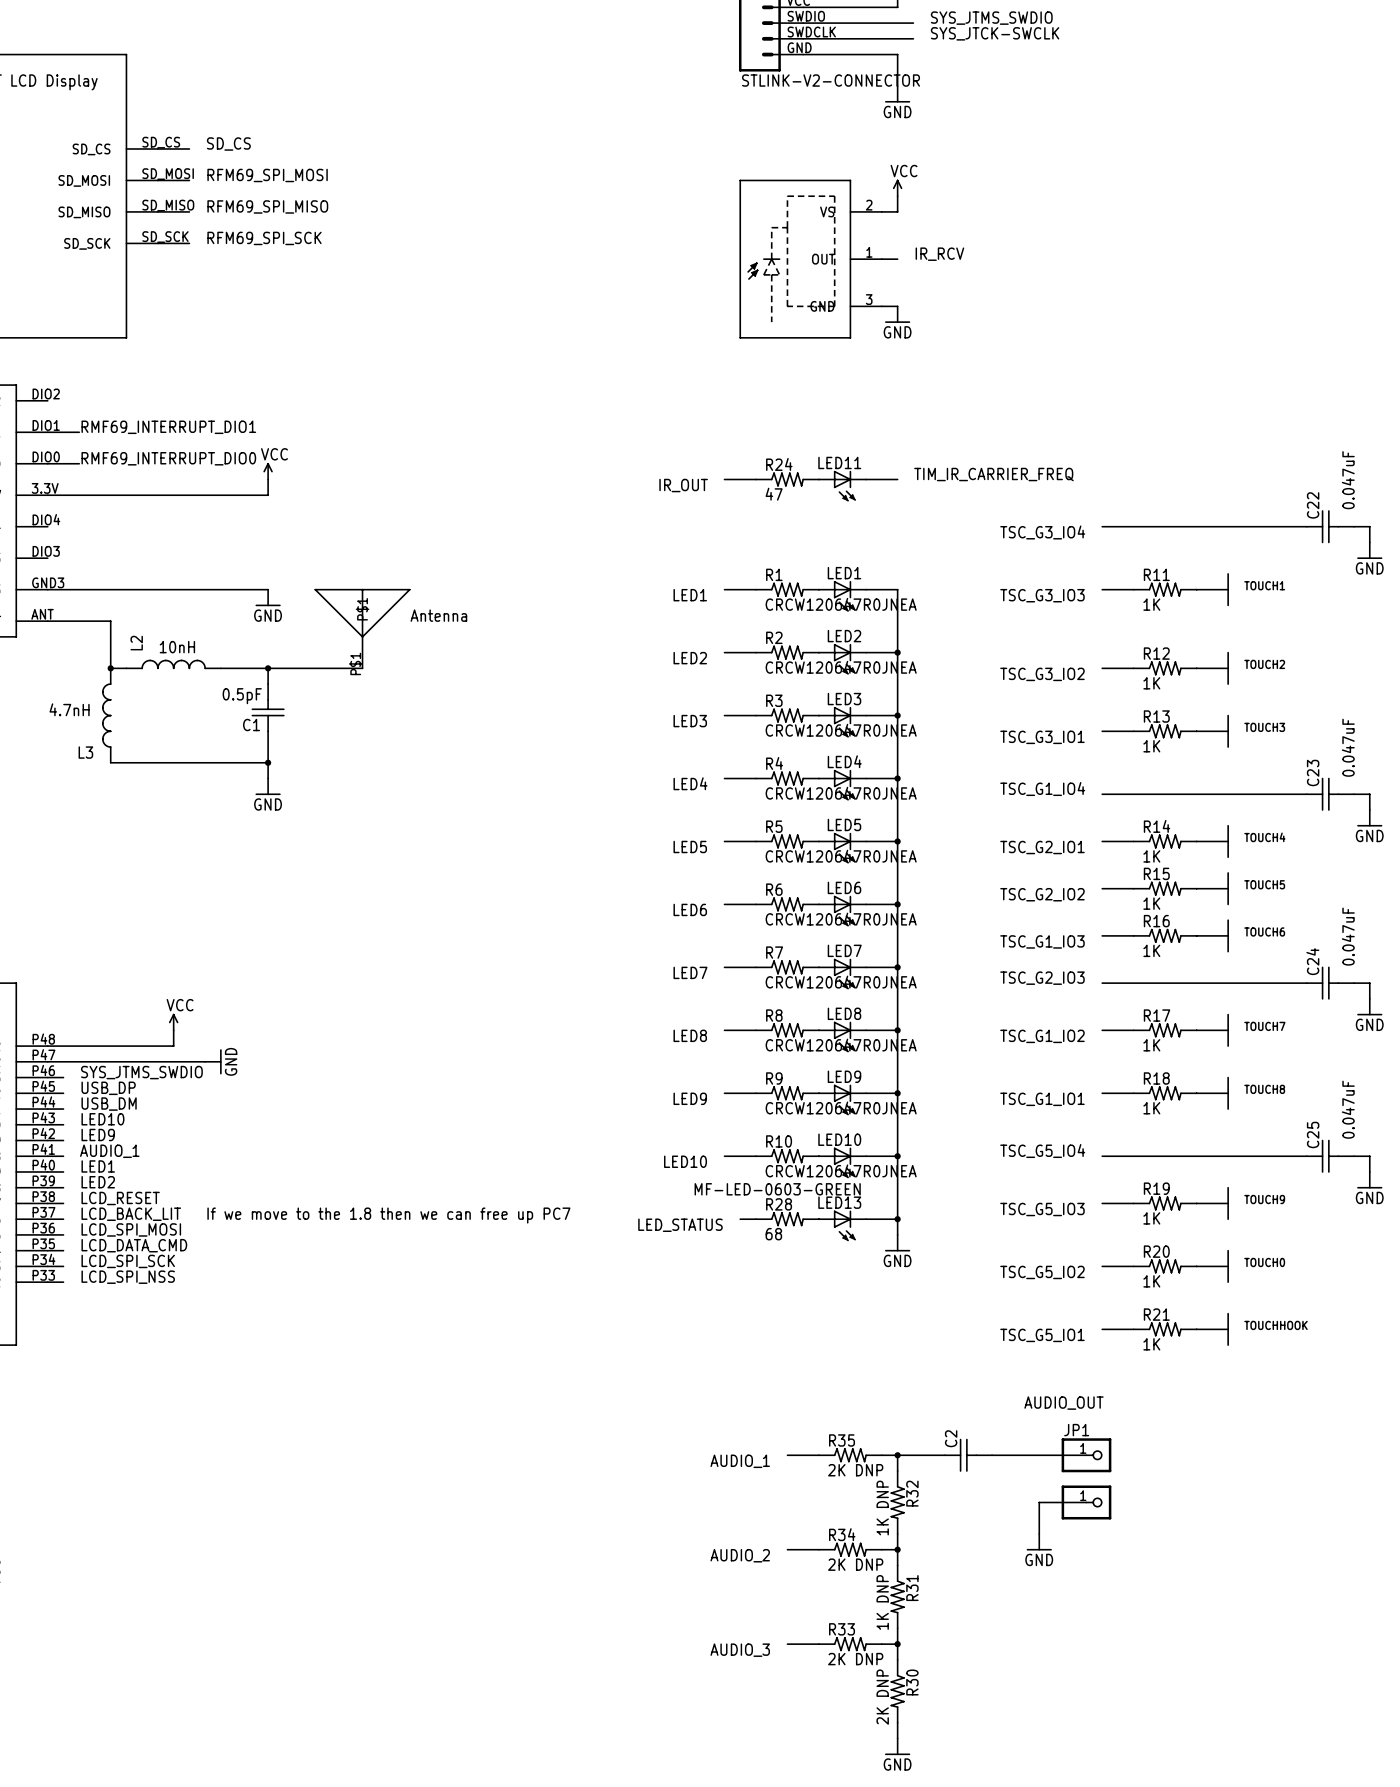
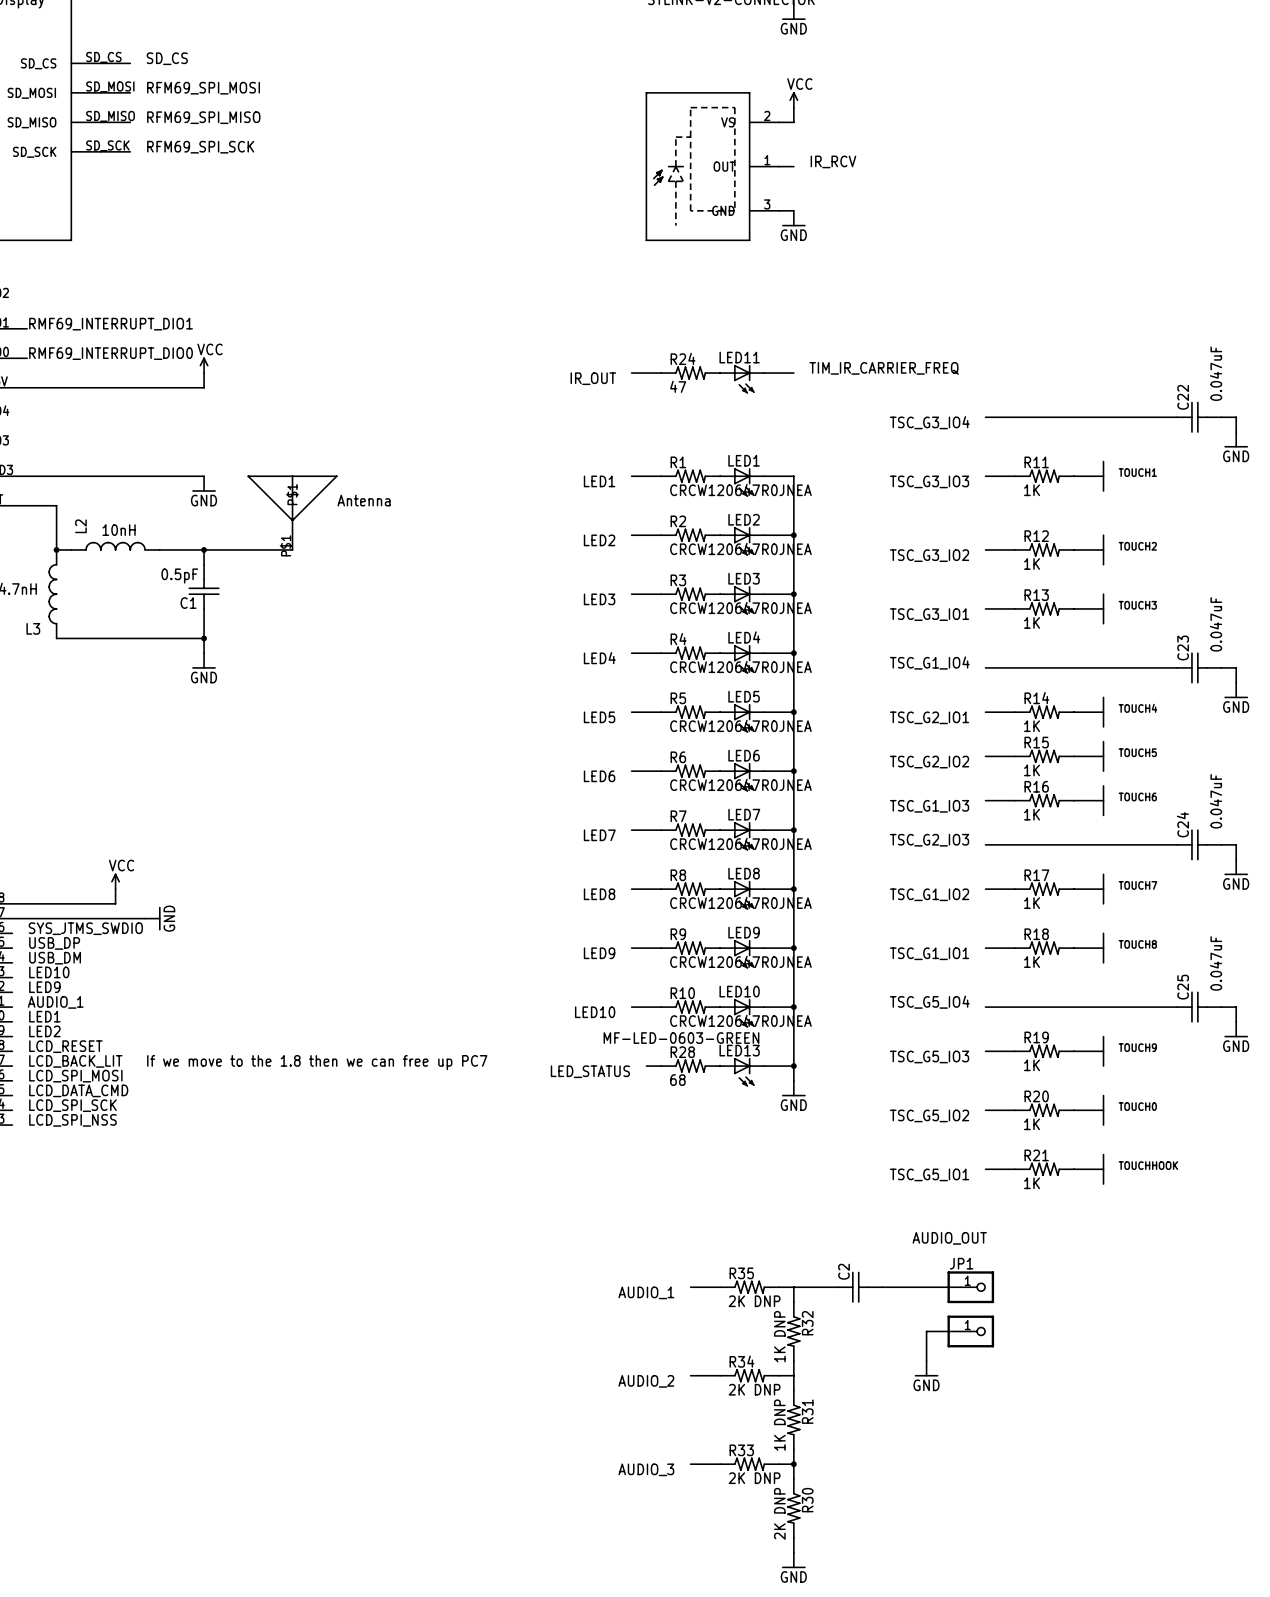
junction: (897, 1455) -> none
junction: (897, 1549) -> none

